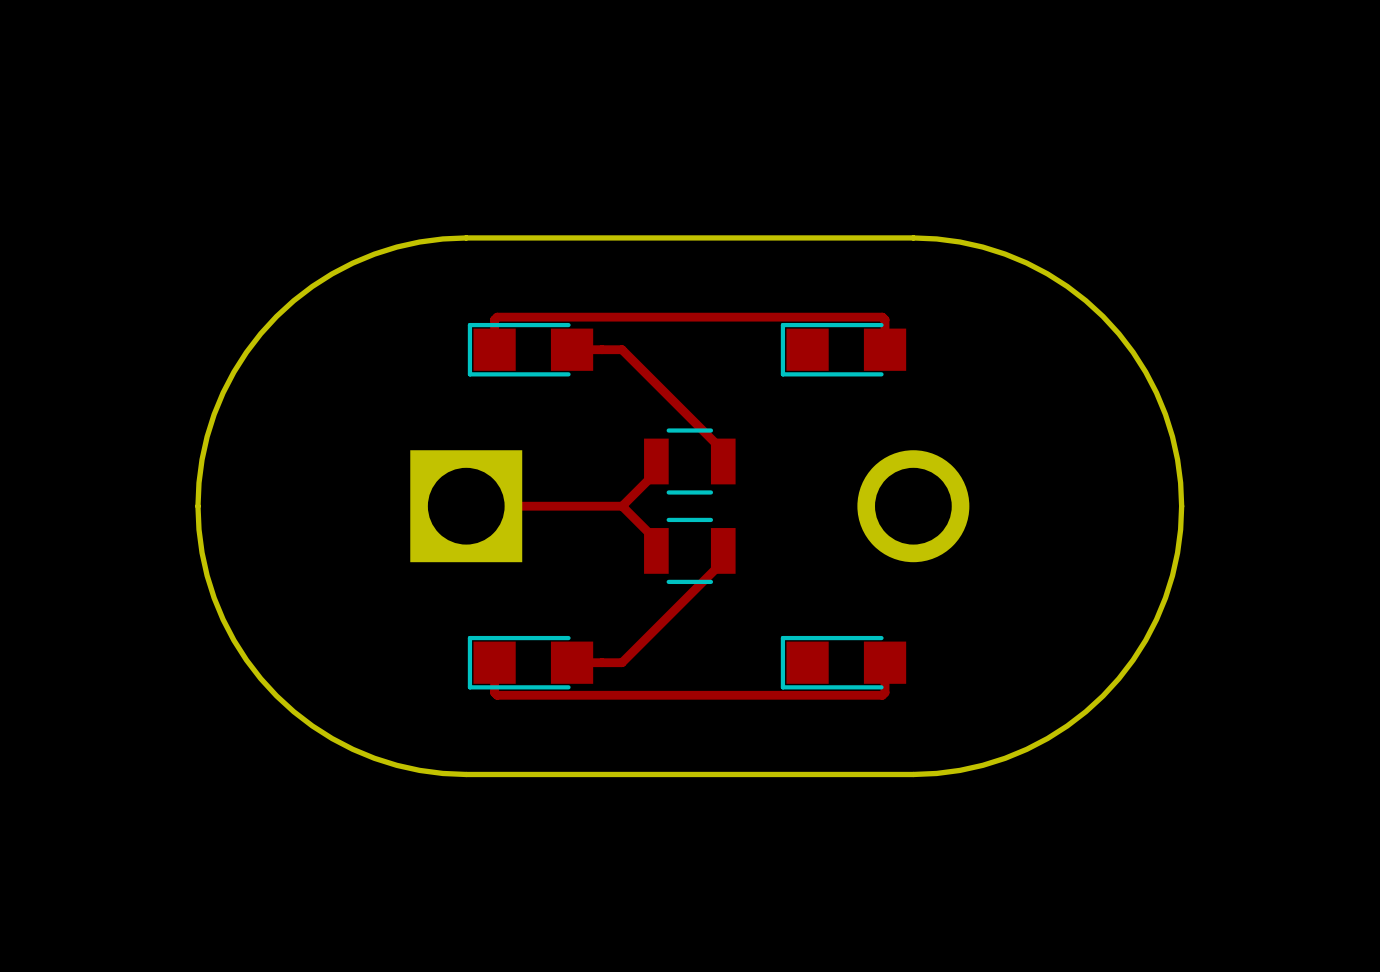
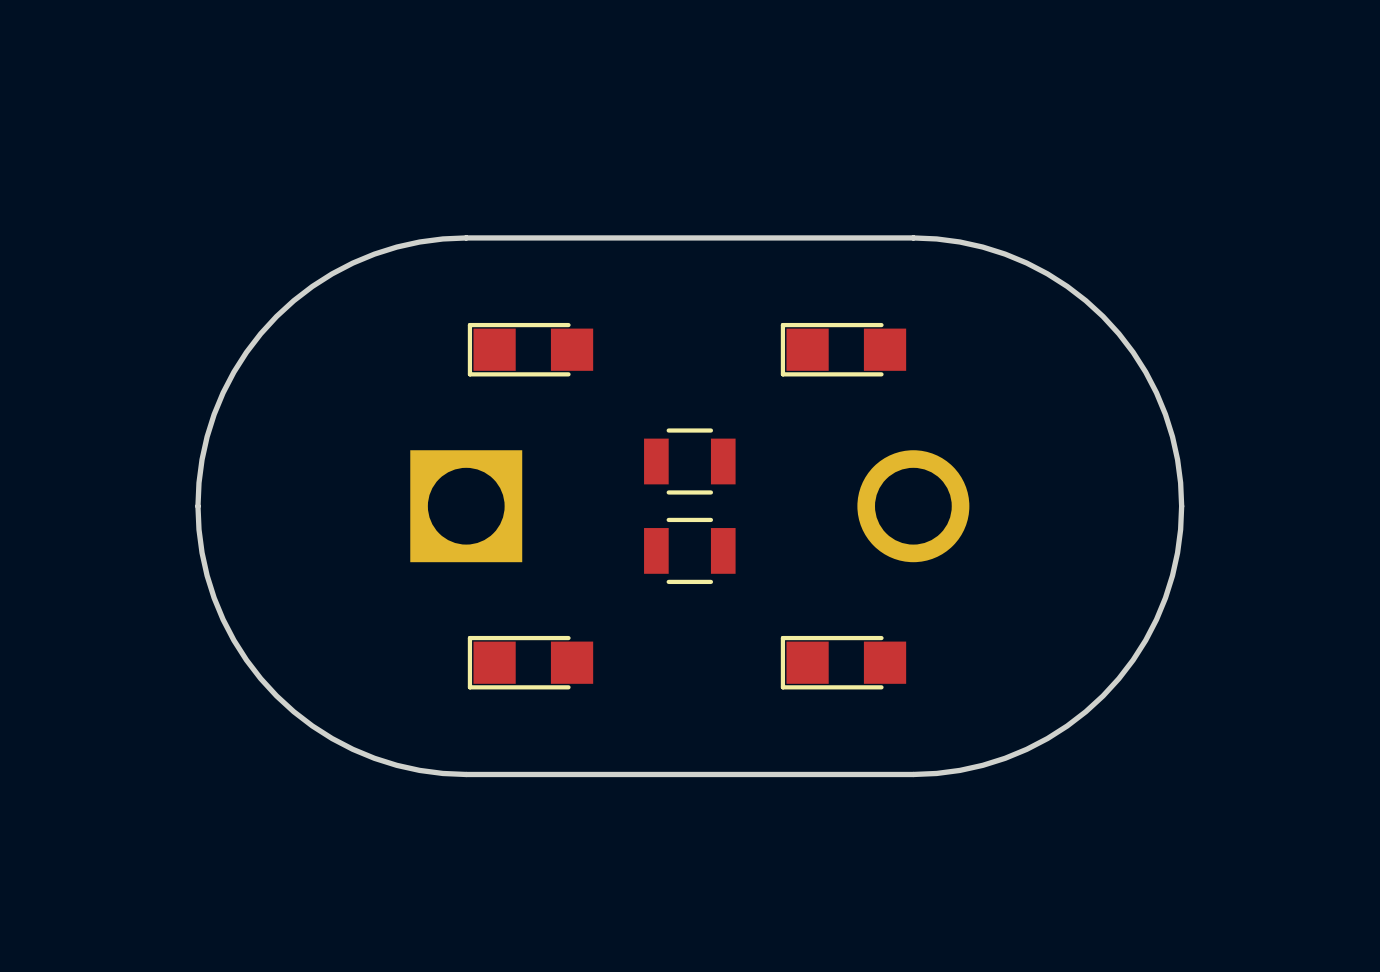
track: (494, 349) (494, 319) (497, 317) (882, 317) (885, 319) (885, 349) -> none
track: (572, 349) (622, 349) (723, 450) (723, 461) -> none
track: (656, 461) (656, 472) (622, 506) -> none
track: (466, 506) (622, 506) -> none
track: (622, 506) (656, 540) (656, 550) -> none
track: (723, 550) (723, 561) (622, 662) (572, 662) -> none
track: (494, 662) (494, 692) (497, 695) (882, 695) (885, 692) (885, 662) -> none

